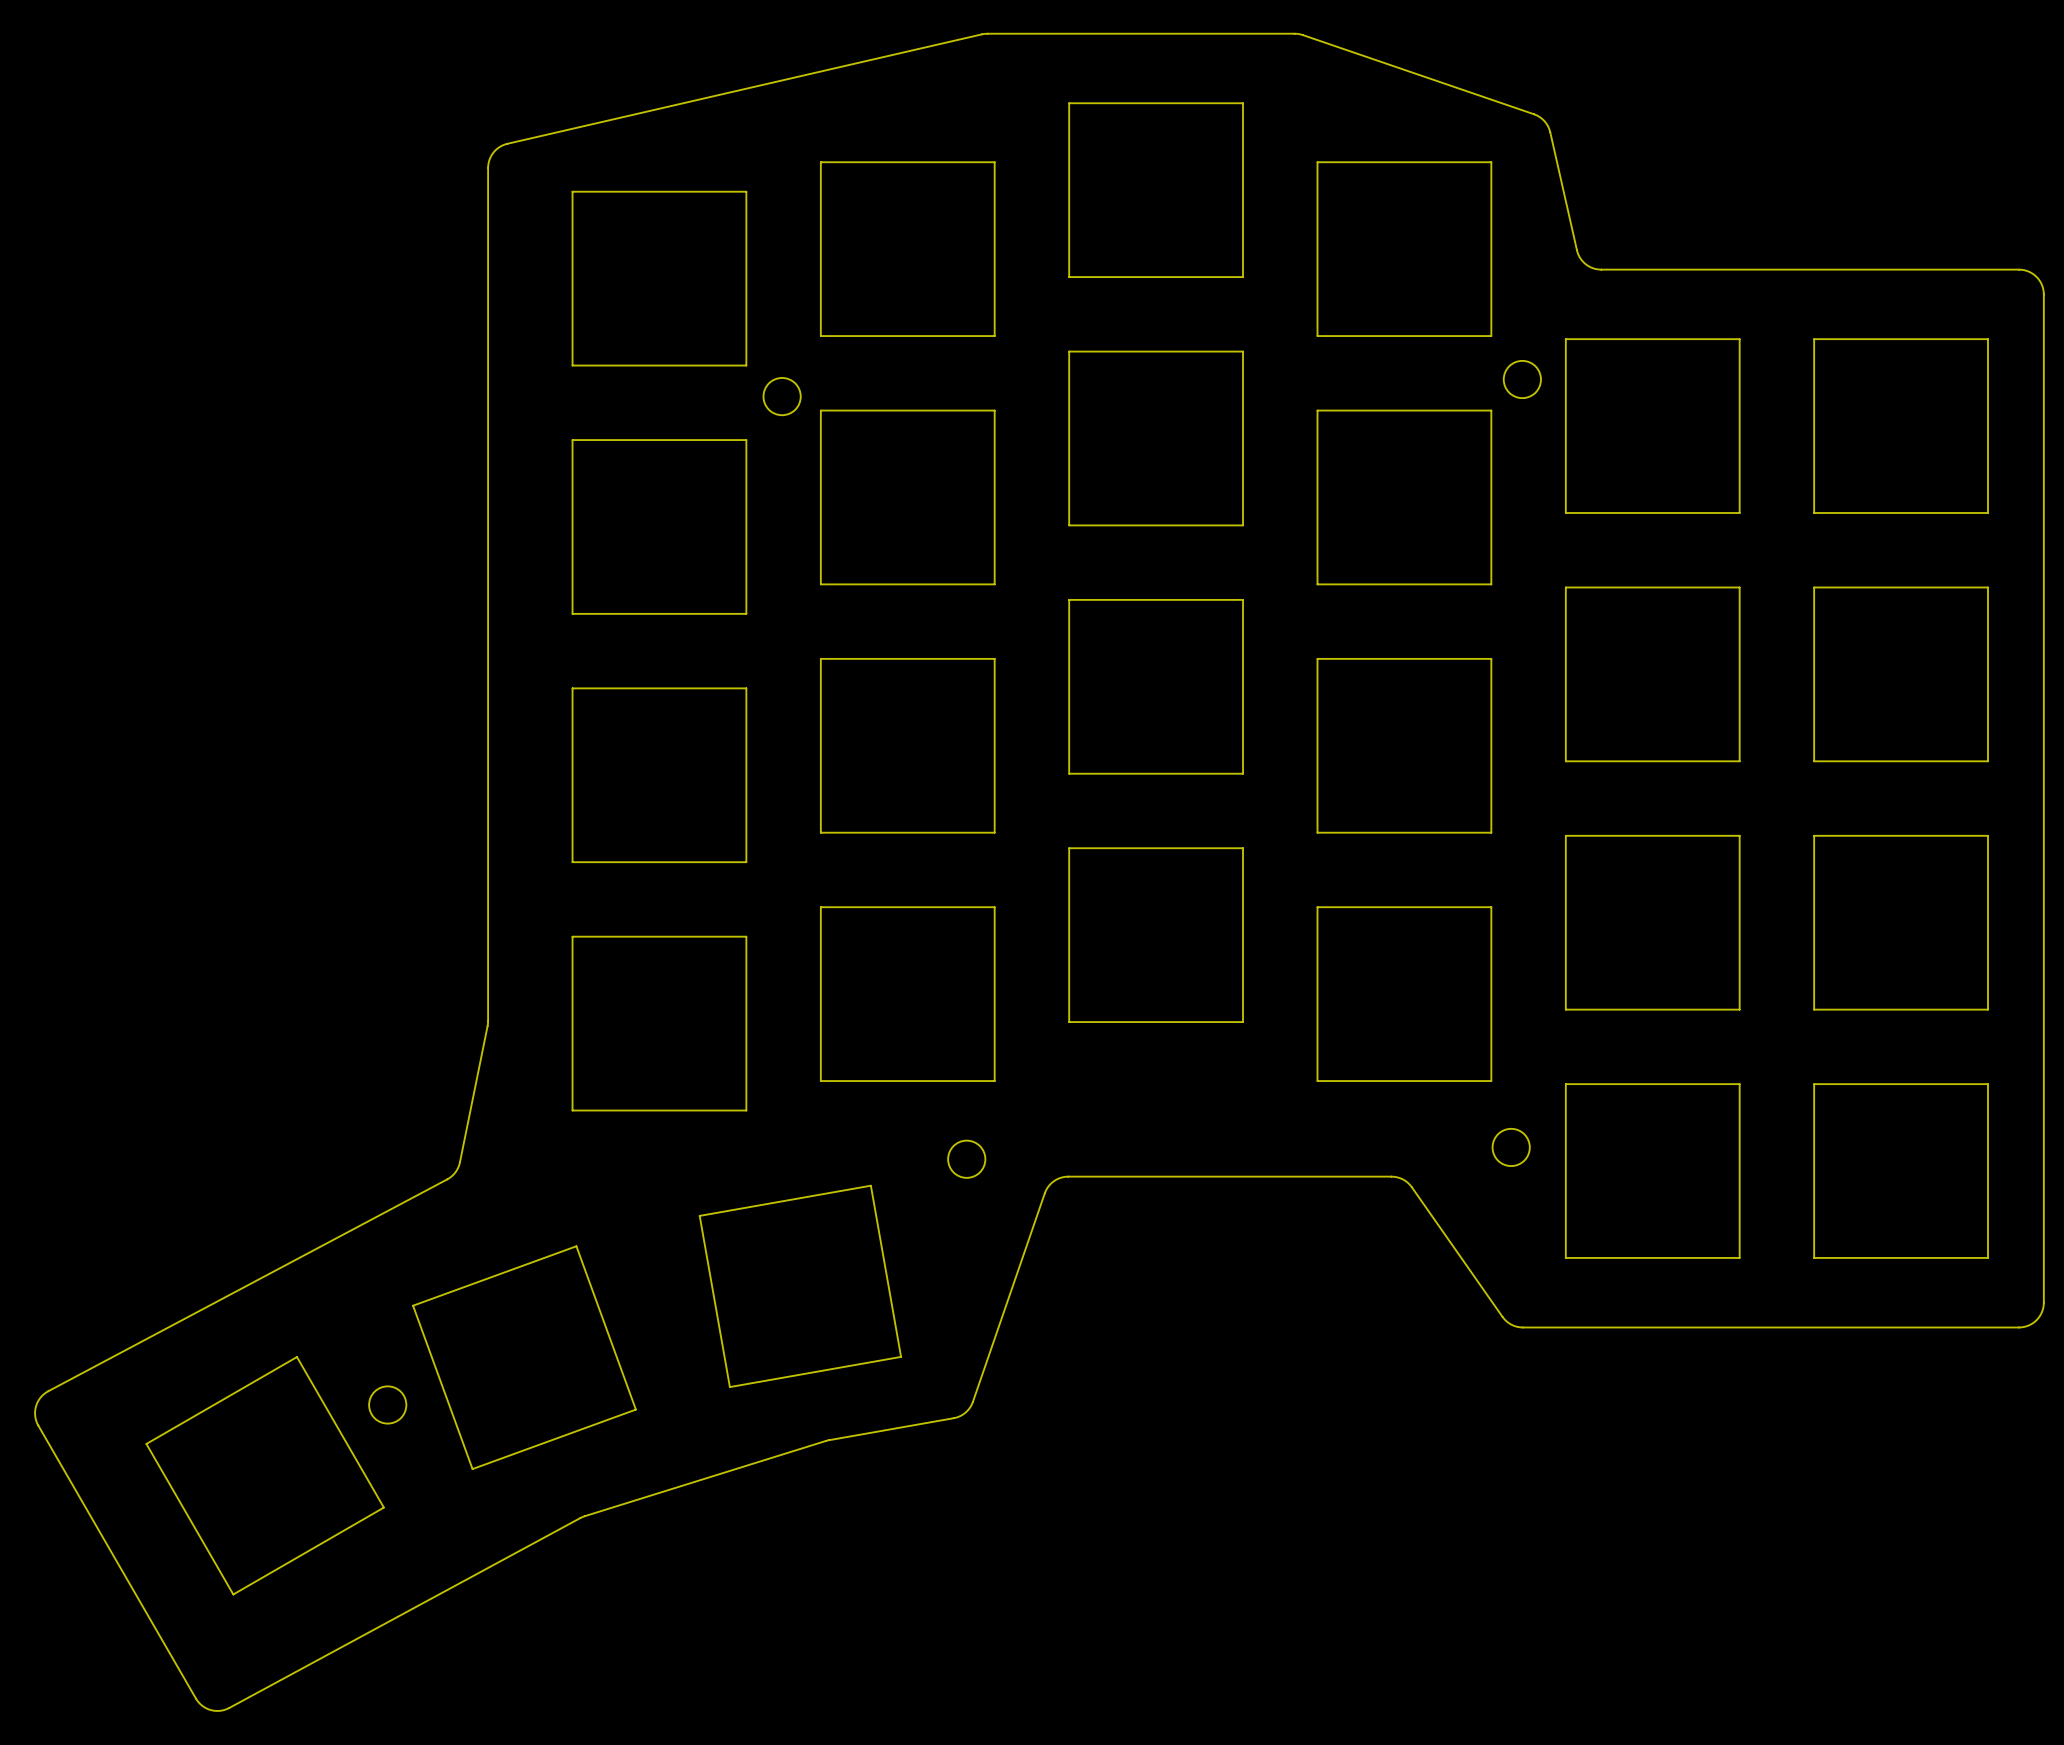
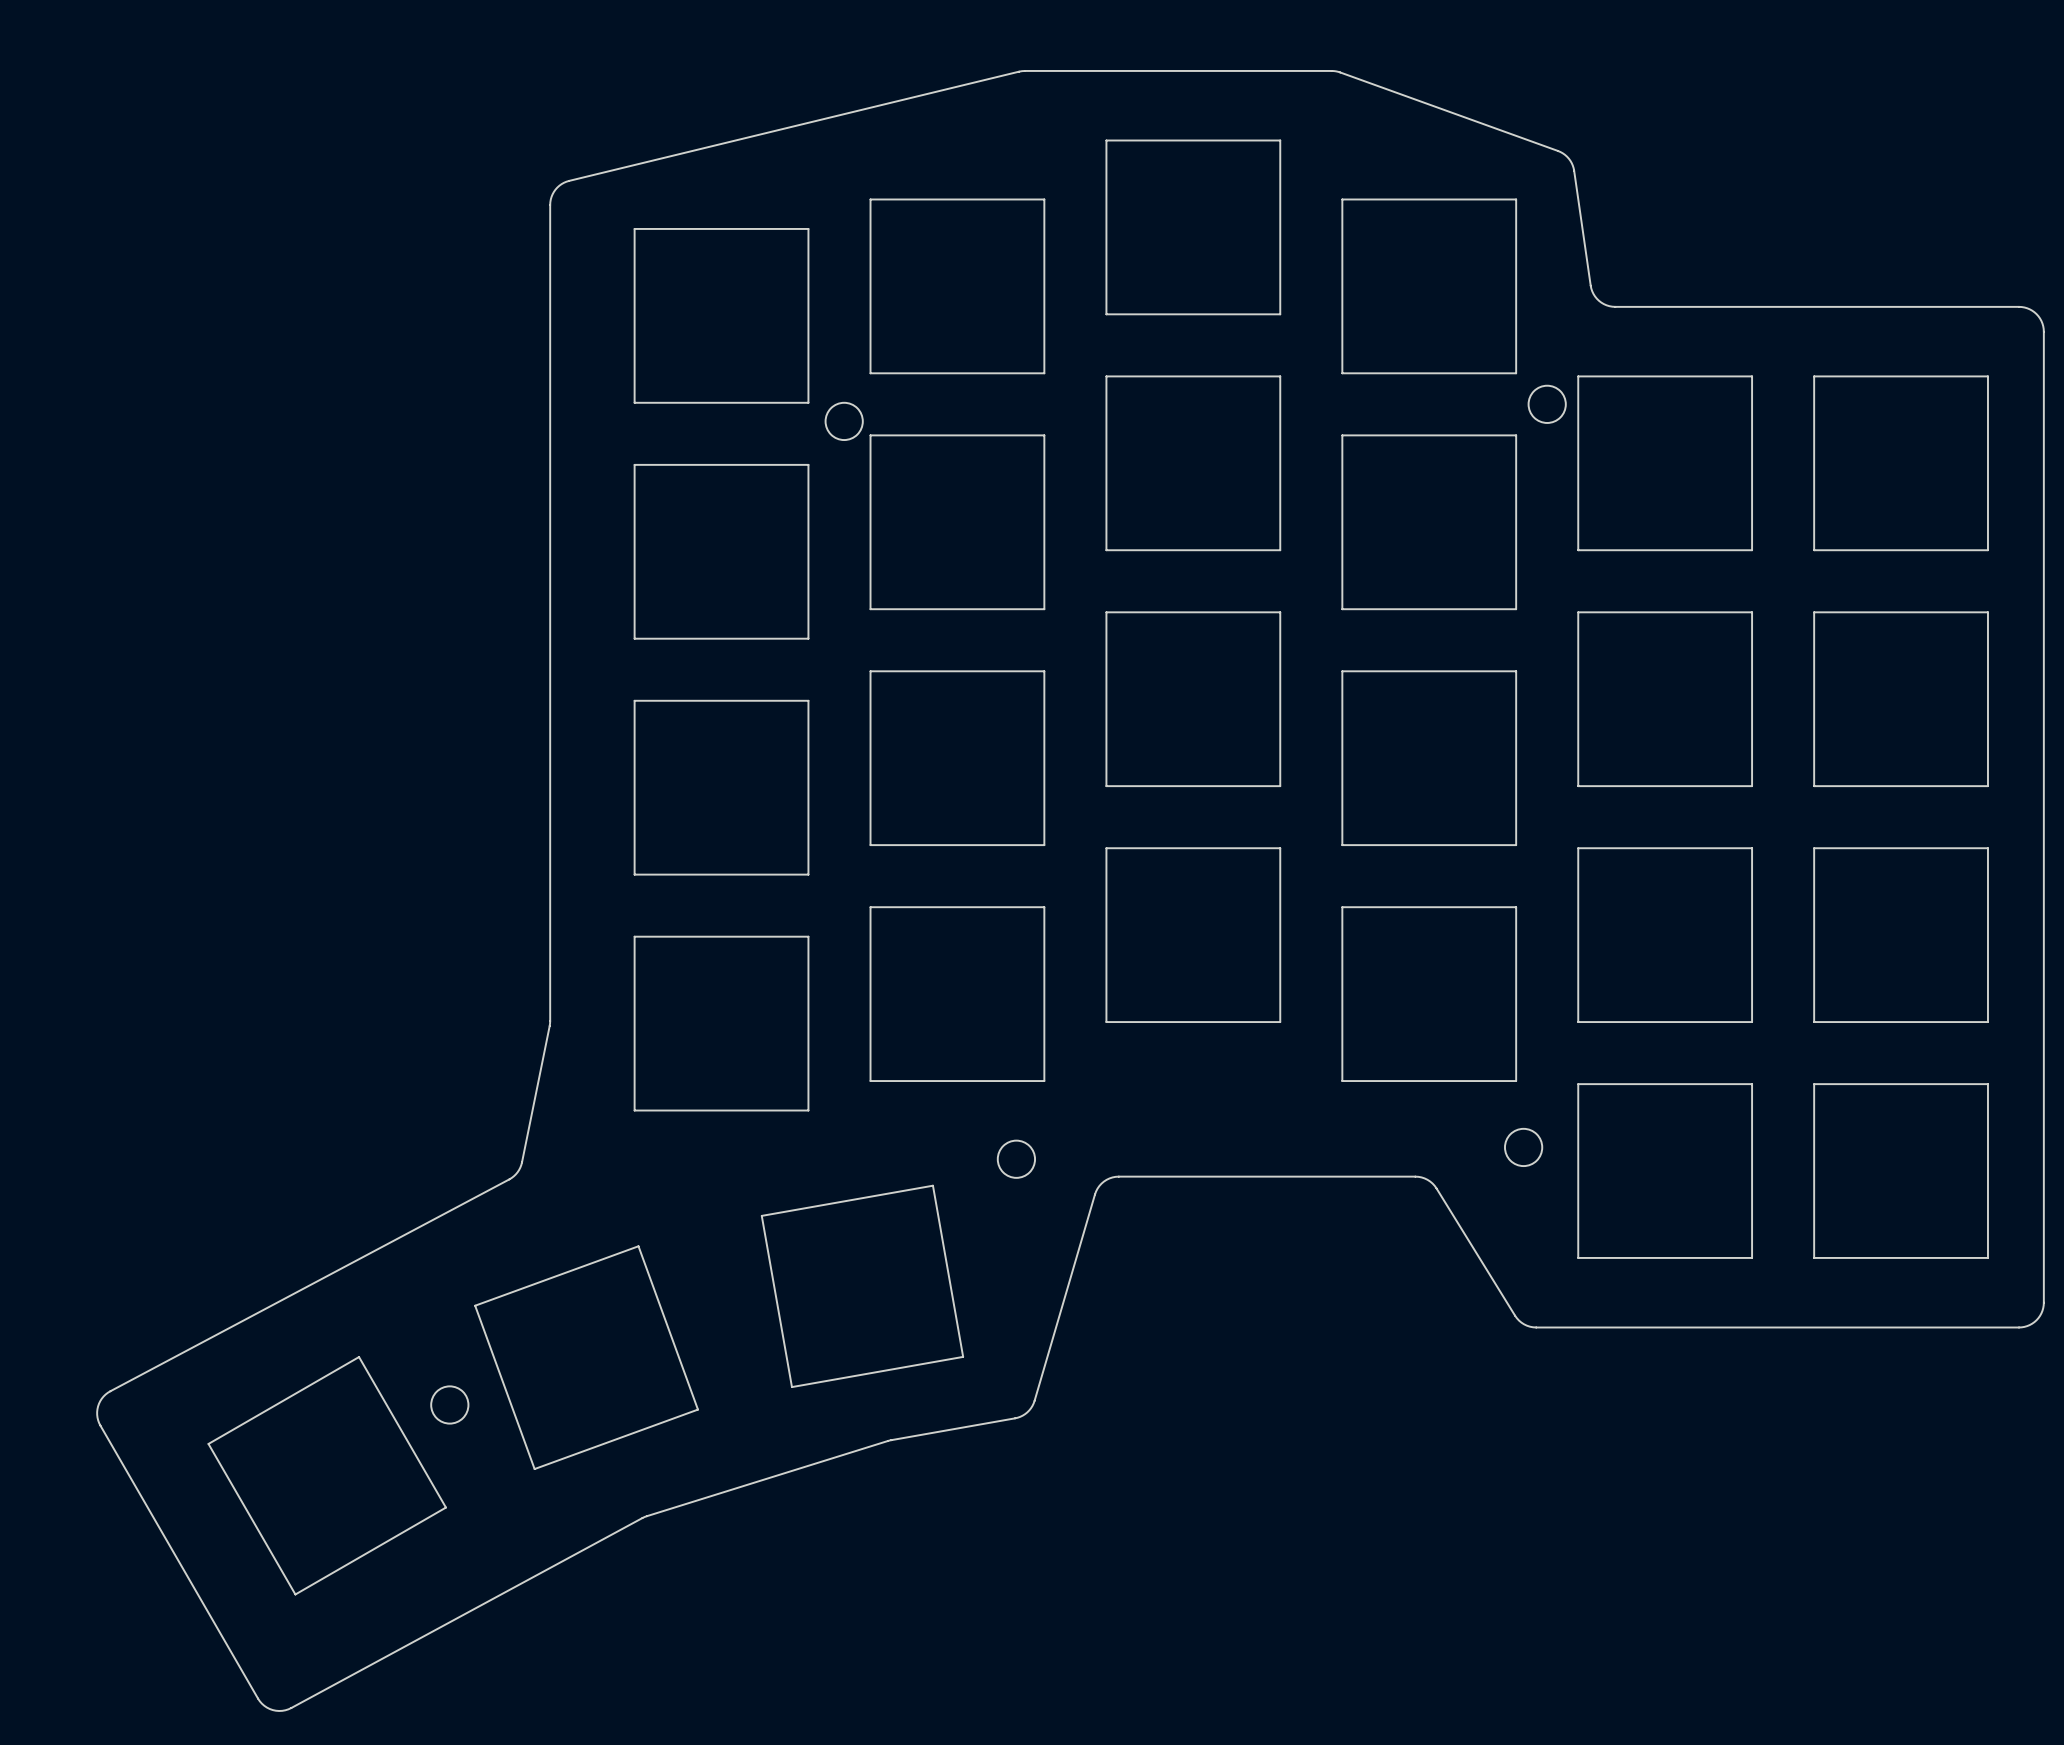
board edge: (1243, 103) (1243, 277) (1069, 277) (1069, 103) (1243, 103) -> (1280, 140) (1280, 314) (1106, 314) (1106, 140) (1280, 140)
board edge: (994, 162) (820, 162) (820, 336) (994, 336) (994, 162) -> (1044, 199) (870, 199) (870, 373) (1044, 373) (1044, 199)
board edge: (1491, 162) (1491, 336) (1317, 336) (1317, 162) (1491, 162) -> (1516, 199) (1516, 373) (1342, 373) (1342, 199) (1516, 199)
board edge: (746, 191) (746, 365) (572, 365) (572, 191) (746, 191) -> (808, 228) (808, 402) (634, 402) (634, 228) (808, 228)
board edge: (2043, 331) (2042, 286) (2034, 275) (2021, 269) (1592, 268) (1583, 262) (1577, 252) (1550, 132) (1542, 118) (1534, 114) (1296, 33) (984, 33) (507, 143) (495, 150) (489, 159) (488, 168) (488, 1021) (459, 1165) (453, 1174) (447, 1179) (48, 1391) (39, 1398) (35, 1409) (38, 1425) (195, 1698) (202, 1705) (210, 1710) (220, 1710) (229, 1708) (582, 1517) (827, 1440) (961, 1415) (969, 1408) (972, 1401) (1047, 1187) (1056, 1179) (1065, 1176) (1118, 1176) -> (2043, 331) (2042, 323) (2036, 314) (2021, 307) (1615, 306) (1606, 305) (1596, 298) (1591, 288) (1574, 170) (1571, 163) (1565, 154) (1333, 71) (1022, 71) (569, 180) (557, 187) (552, 194) (550, 205) (550, 1021) (521, 1165) (515, 1174) (509, 1179) (107, 1392) (101, 1398) (97, 1409) (100, 1425) (258, 1698) (269, 1708) (285, 1710) (644, 1517) (889, 1440) (1015, 1418) (1025, 1414) (1034, 1400) (1096, 1191) (1103, 1181) (1118, 1176)
board edge: (1739, 339) (1565, 339) (1565, 512) (1739, 512) (1739, 339) -> (1752, 376) (1578, 376) (1578, 550) (1752, 550) (1752, 376)
board edge: (1243, 351) (1243, 525) (1069, 525) (1069, 351) (1243, 351) -> (1280, 376) (1280, 550) (1106, 550) (1106, 376) (1280, 376)
board edge: (1987, 376) (1987, 339) (1814, 339) (1814, 376) -> (1987, 376) (1814, 376)
round board edge position: (1522, 379) -> (1547, 404)
round board edge position: (782, 396) -> (844, 421)
board edge: (994, 410) (820, 410) (820, 584) (994, 584) (994, 410) -> (1044, 435) (870, 435) (870, 609) (1044, 609) (1044, 435)
board edge: (1491, 410) (1491, 584) (1317, 584) (1317, 410) (1491, 410) -> (1516, 435) (1516, 609) (1342, 609) (1342, 435) (1516, 435)
board edge: (746, 440) (746, 613) (572, 613) (572, 440) (746, 440) -> (808, 464) (808, 638) (634, 638) (634, 464) (808, 464)
board edge: (1987, 512) (1814, 512) -> (1987, 512) (1987, 550) (1814, 550) (1814, 512)
board edge: (1739, 587) (1565, 587) (1565, 761) (1739, 761) (1739, 587) -> (1752, 612) (1578, 612) (1578, 786) (1752, 786) (1752, 612)
board edge: (1243, 599) (1243, 773) (1069, 773) (1069, 599) (1243, 599) -> (1280, 612) (1280, 786) (1106, 786) (1106, 612) (1280, 612)
board edge: (1987, 612) (1987, 587) (1814, 587) (1814, 612) -> (1987, 612) (1814, 612)
board edge: (994, 658) (820, 658) (820, 832) (994, 832) (994, 658) -> (1044, 671) (870, 671) (870, 845) (1044, 845) (1044, 671)
board edge: (1491, 658) (1491, 832) (1317, 832) (1317, 658) (1491, 658) -> (1516, 671) (1516, 845) (1342, 845) (1342, 671) (1516, 671)
board edge: (746, 688) (746, 862) (572, 862) (572, 688) (746, 688) -> (808, 700) (808, 874) (634, 874) (634, 700) (808, 700)
board edge: (1987, 761) (1814, 761) -> (1987, 761) (1987, 786) (1814, 786) (1814, 761)
board edge: (1739, 835) (1565, 835) (1565, 1009) (1739, 1009) (1739, 835) -> (1752, 848) (1578, 848) (1578, 1022) (1752, 1022) (1752, 848)
board edge: (1106, 848) (1069, 848) (1069, 1022) (1106, 1022) -> (1106, 848) (1106, 1022)
board edge: (1243, 848) (1243, 1022) -> (1243, 848) (1280, 848) (1280, 1022) (1243, 1022)
board edge: (1987, 848) (1987, 835) (1814, 835) (1814, 848) -> (1987, 848) (1814, 848)
board edge: (870, 907) (820, 907) (820, 1081) (870, 1081) -> (870, 907) (870, 1081)
board edge: (994, 907) (994, 1081) -> (994, 907) (1044, 907) (1044, 1081) (994, 1081)
board edge: (1342, 907) (1317, 907) (1317, 1081) (1342, 1081) -> (1342, 907) (1342, 1081)
board edge: (1491, 907) (1491, 1081) -> (1491, 907) (1516, 907) (1516, 1081) (1491, 1081)
board edge: (634, 936) (572, 936) (572, 1110) (634, 1110) -> (634, 936) (634, 1110)
board edge: (746, 936) (746, 1110) -> (746, 936) (808, 936) (808, 1110) (746, 1110)
board edge: (1987, 1009) (1814, 1009) -> (1987, 1009) (1987, 1022) (1814, 1022) (1814, 1009)
board edge: (1578, 1084) (1565, 1084) (1565, 1257) (1578, 1257) -> (1578, 1084) (1578, 1257)
board edge: (1739, 1084) (1739, 1257) -> (1739, 1084) (1752, 1084) (1752, 1257) (1739, 1257)
round board edge position: (1511, 1147) -> (1523, 1147)
round board edge position: (966, 1159) -> (1016, 1159)
board edge: (1391, 1176) (1402, 1179) (1411, 1187) (1504, 1319) (1516, 1326) (1536, 1327) -> (1391, 1176) (1418, 1176) (1432, 1183) (1516, 1318) (1524, 1324) (1536, 1327)
board edge: (870, 1185) (699, 1215) (729, 1387) (901, 1356) (870, 1185) -> (932, 1185) (761, 1215) (791, 1387) (963, 1356) (932, 1185)
board edge: (576, 1246) (413, 1305) (472, 1469) (635, 1409) (576, 1246) -> (638, 1246) (475, 1305) (534, 1469) (697, 1409) (638, 1246)
board edge: (296, 1357) (146, 1443) (233, 1594) (383, 1507) (296, 1357) -> (359, 1357) (208, 1443) (295, 1594) (445, 1507) (359, 1357)
round board edge position: (387, 1404) -> (449, 1404)

